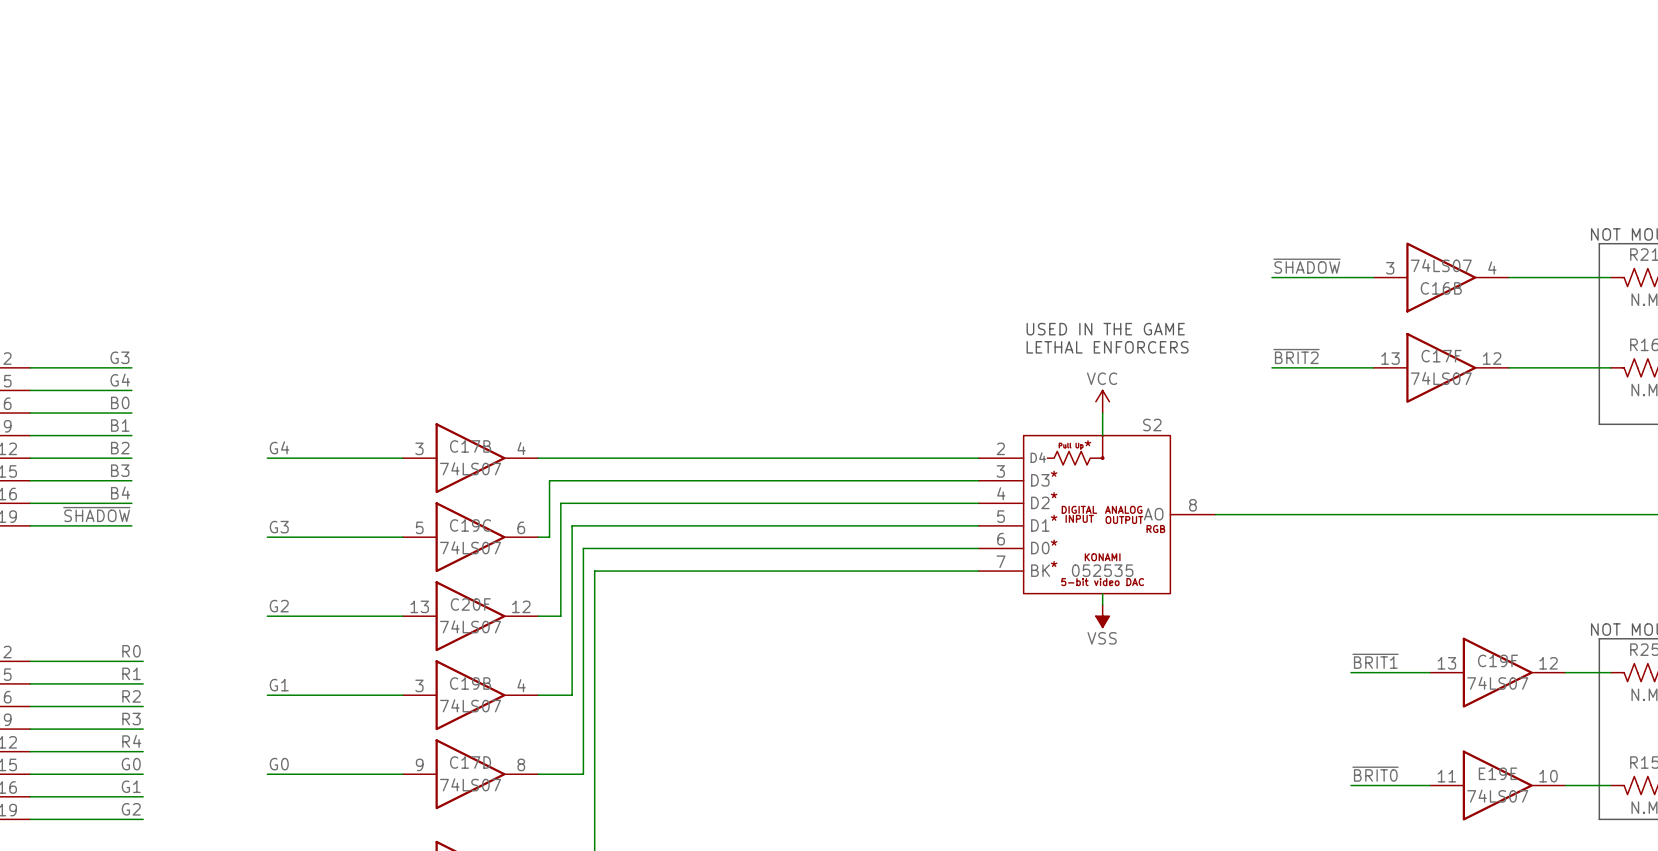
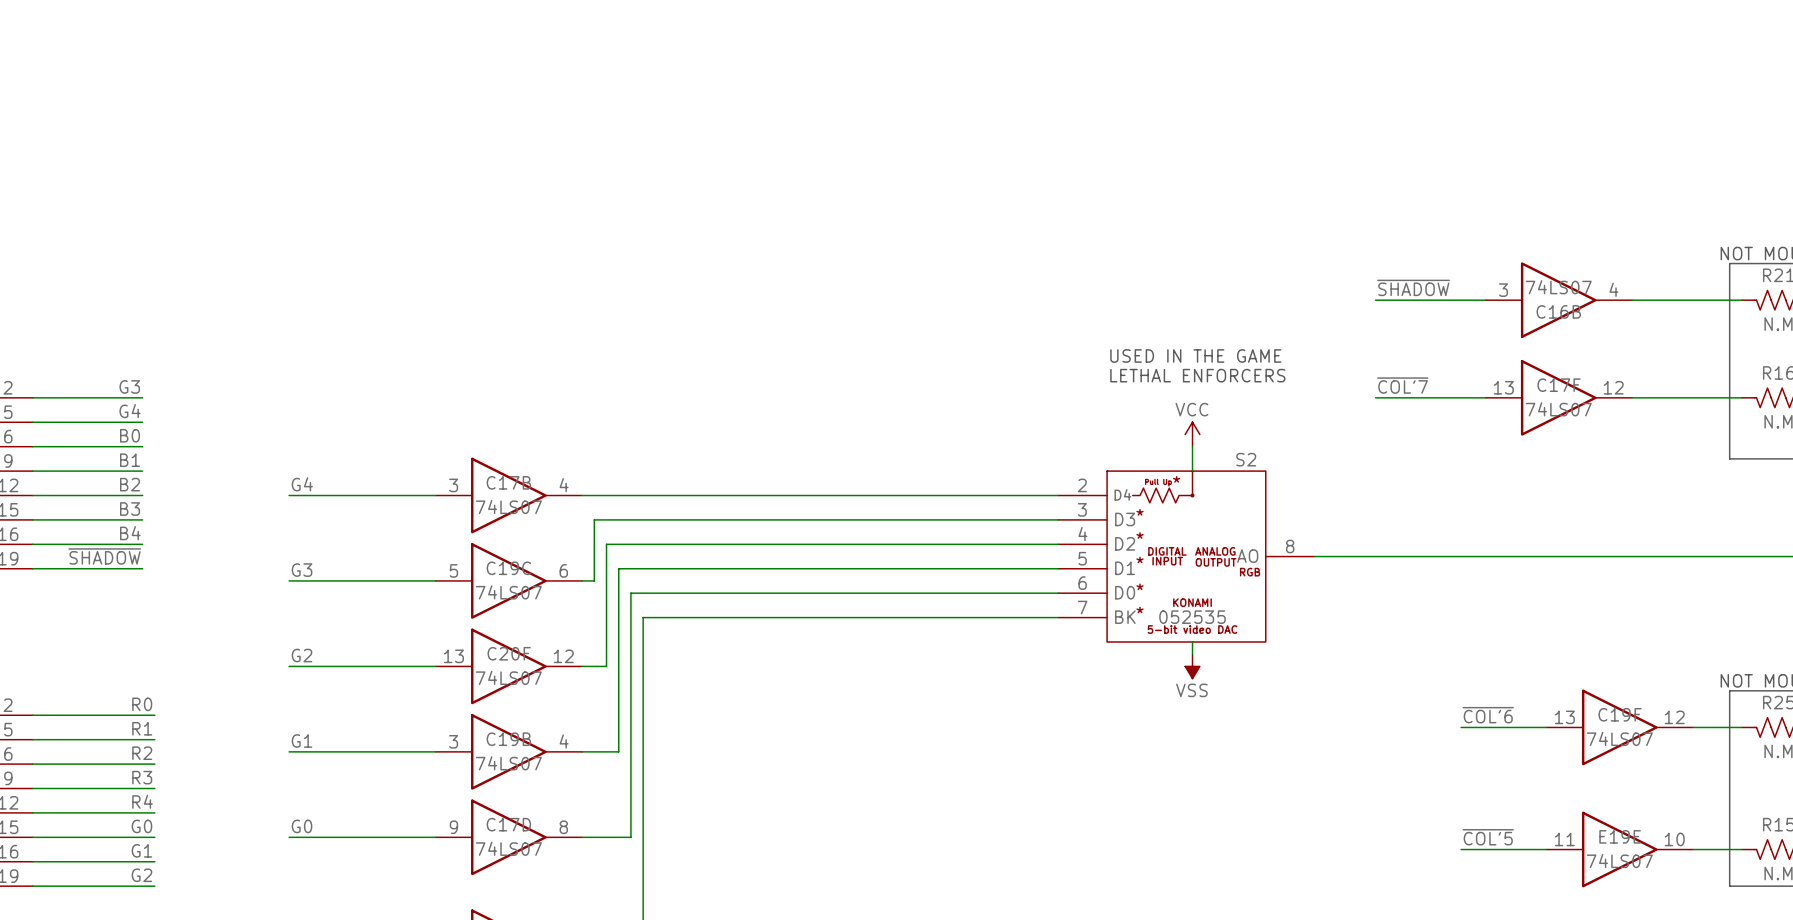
label: ~{BRIT2} (1296, 356) -> ~{COL'7} (1402, 385)
label: ~{BRIT1} (1375, 661) -> ~{COL'6} (1488, 715)
label: ~{BRIT0} (1375, 774) -> ~{COL'5} (1488, 837)

